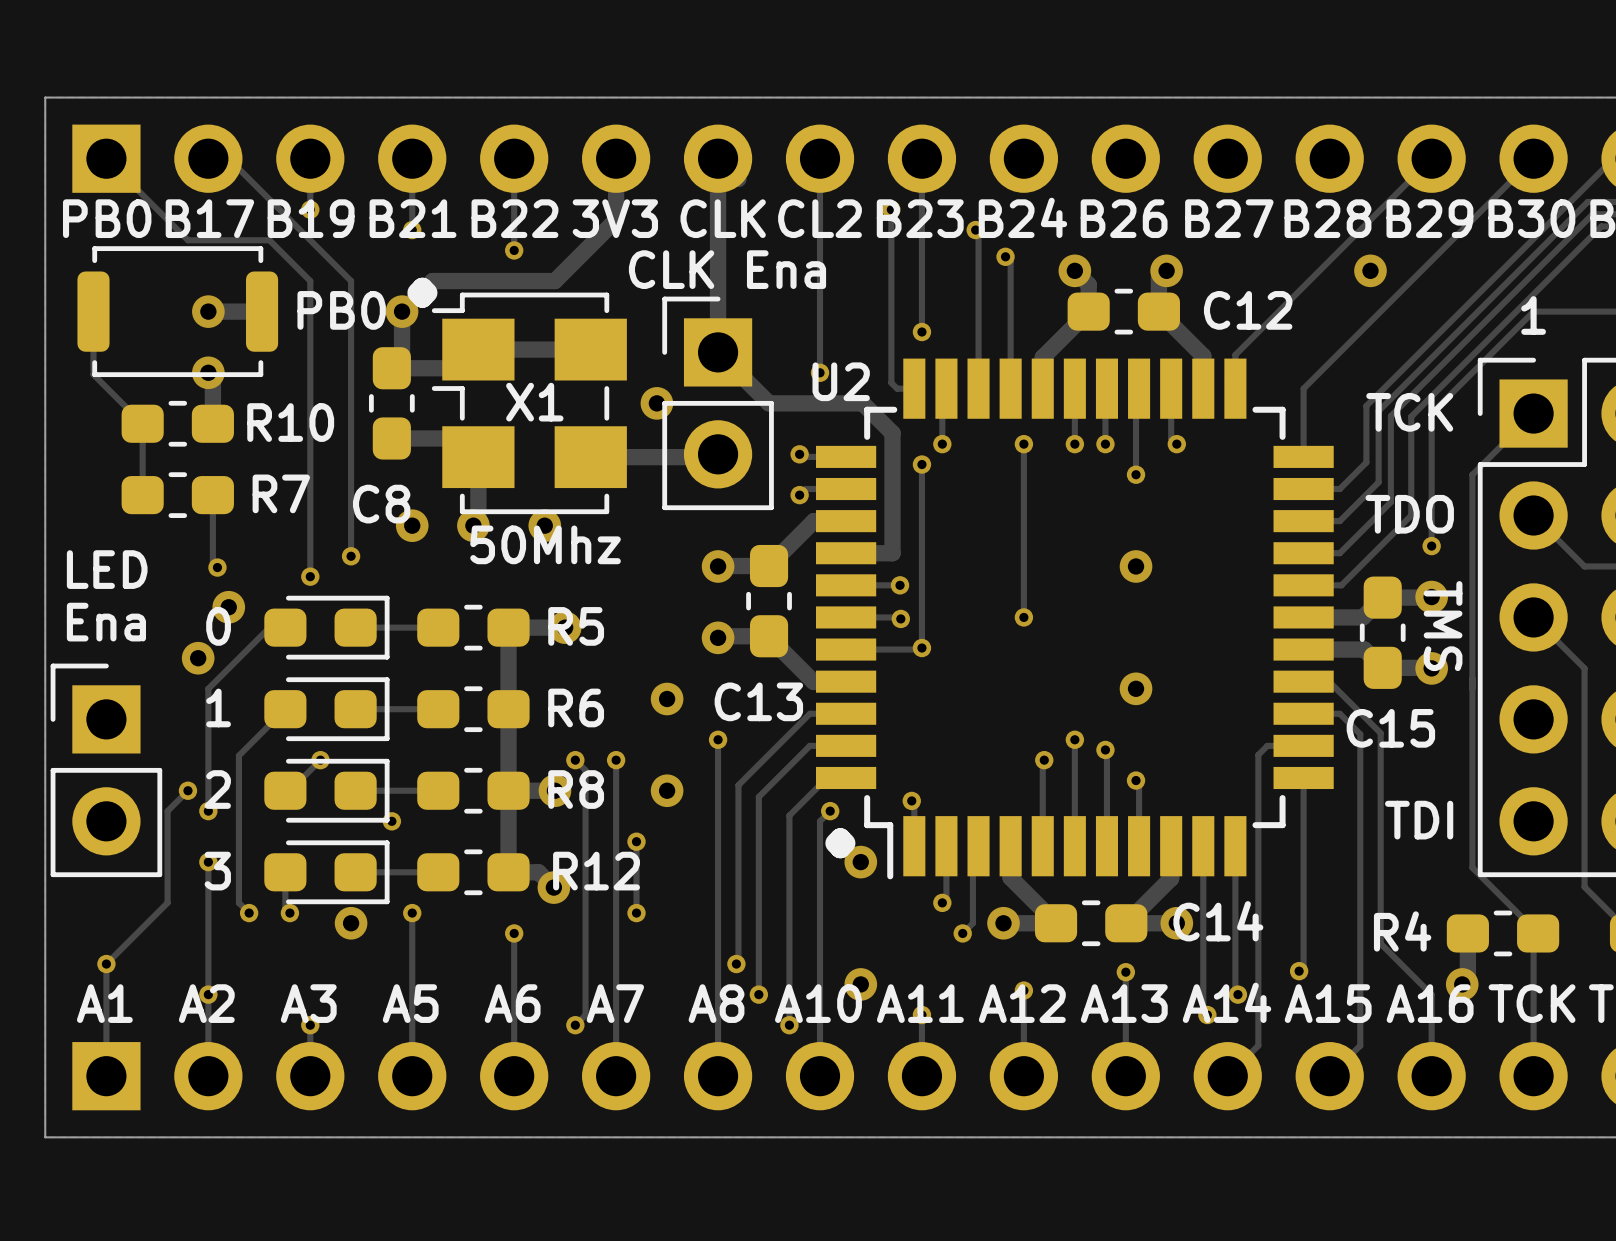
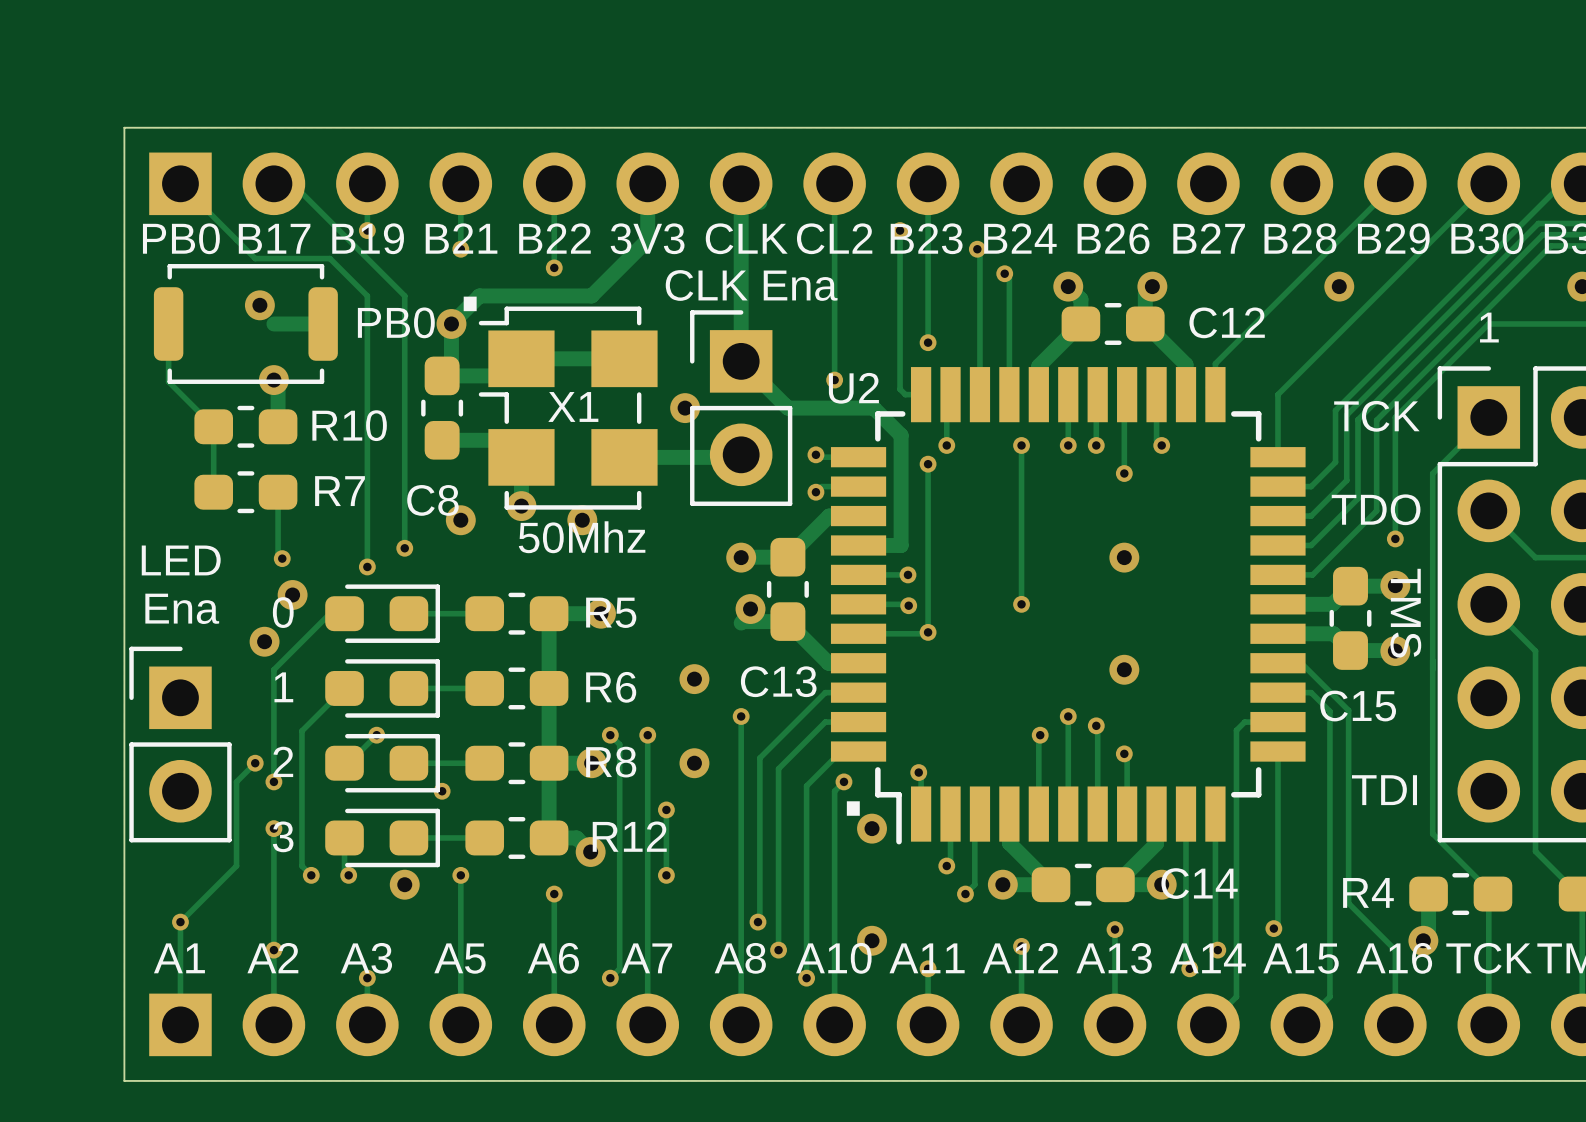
via position: (208, 311) -> (259, 305)
via position: (473, 525) -> (521, 506)
via position: (718, 637) -> (750, 609)

